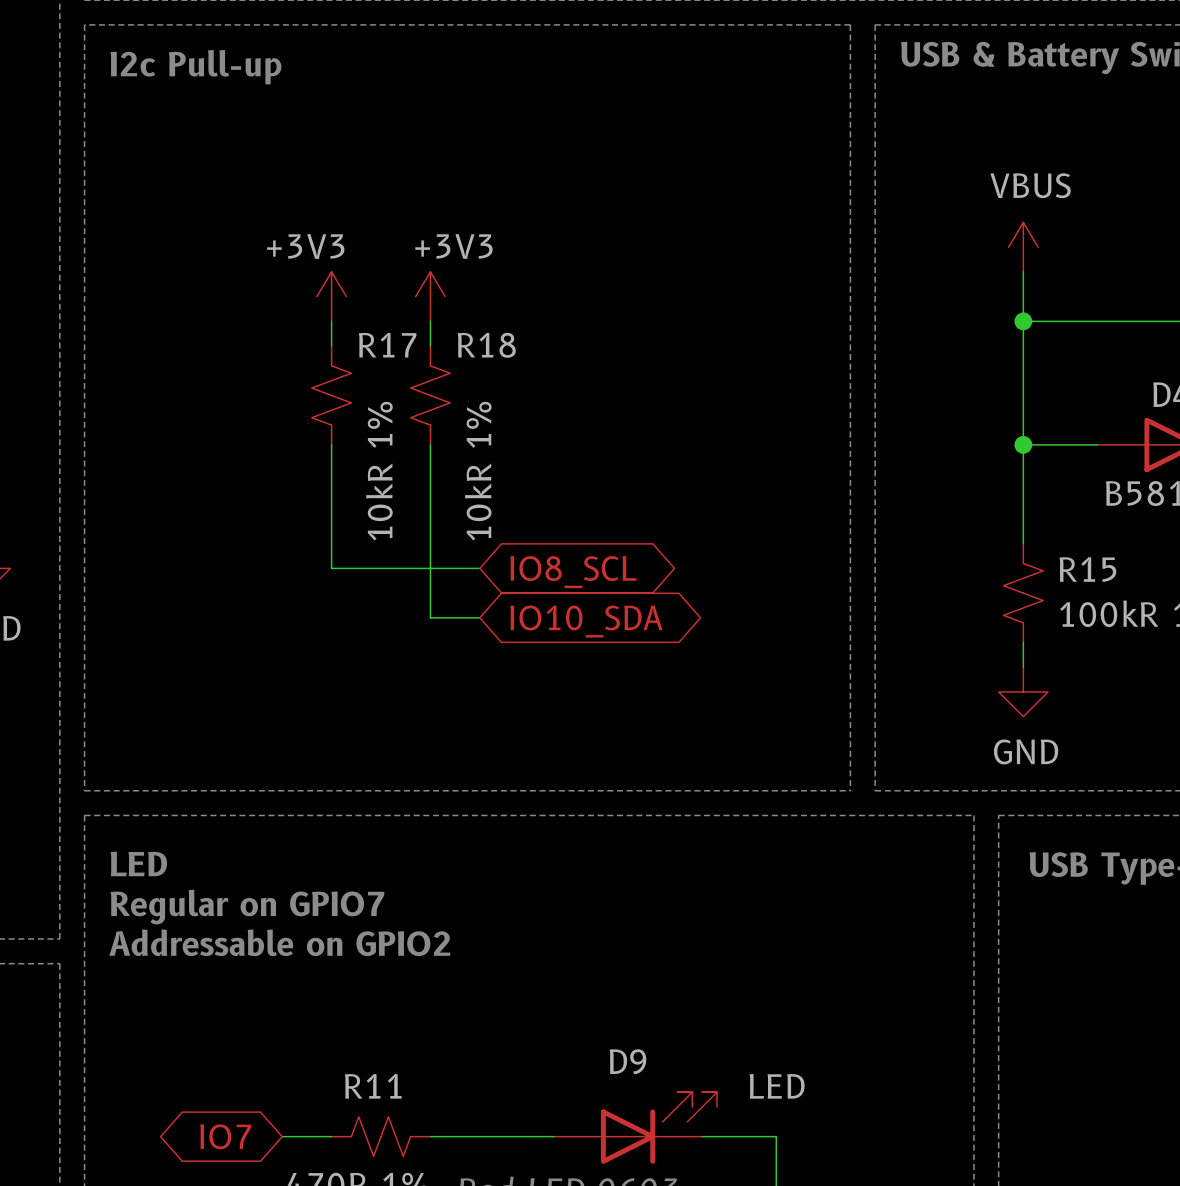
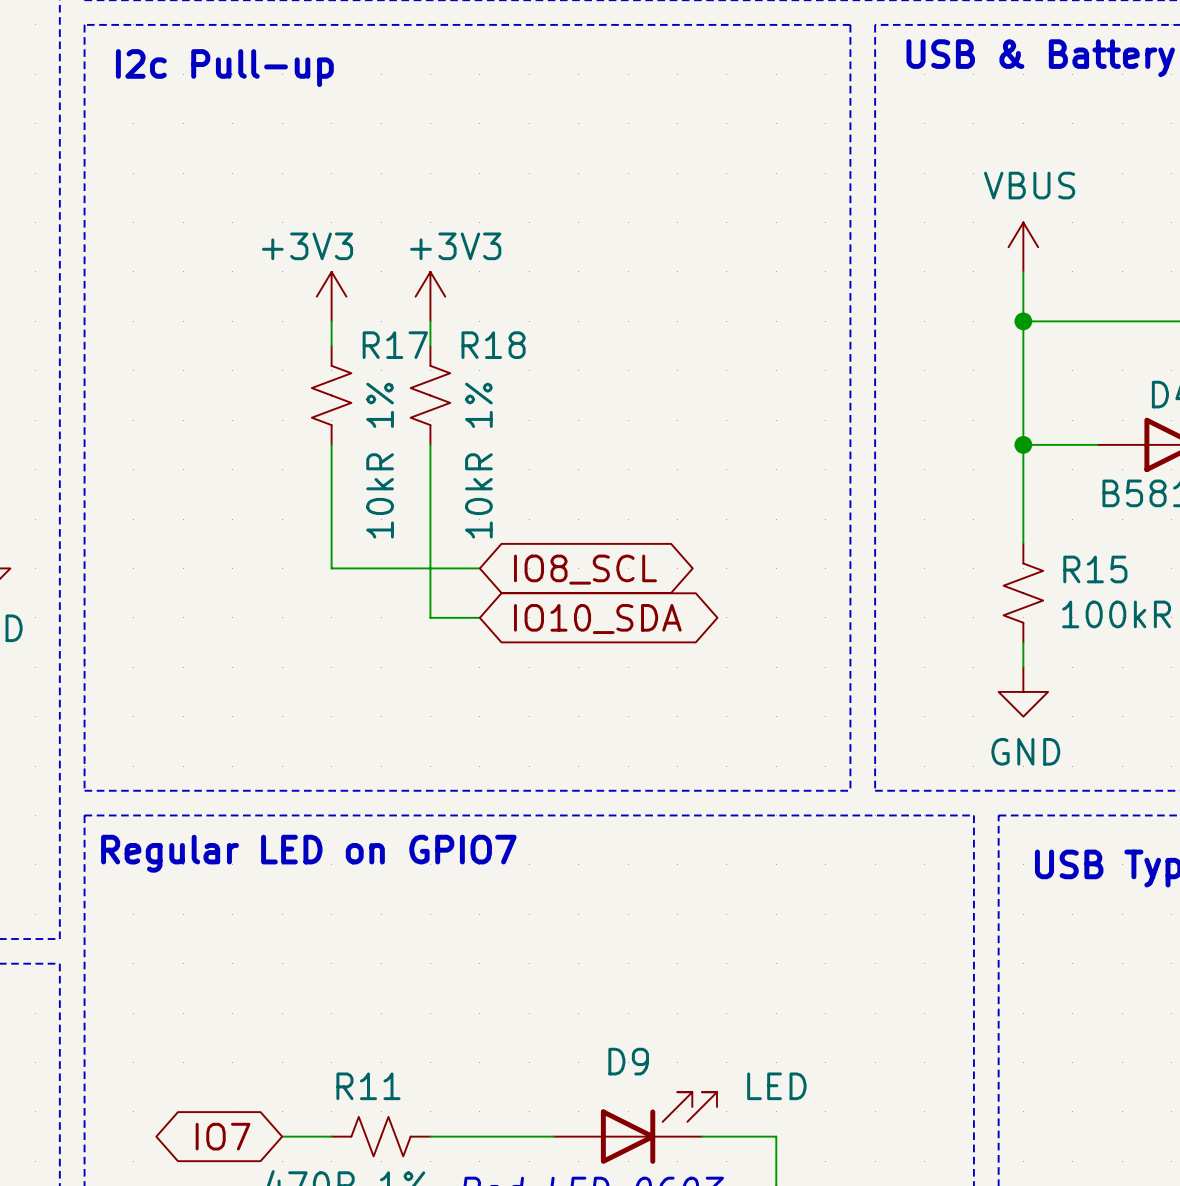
text: none -> Regular LED on GPIO7 (308, 853)
text: LED (138, 863) -> none
text: Regular on GPIO7 (247, 907) -> none
text: Addressable on GPIO2 (279, 942) -> none

